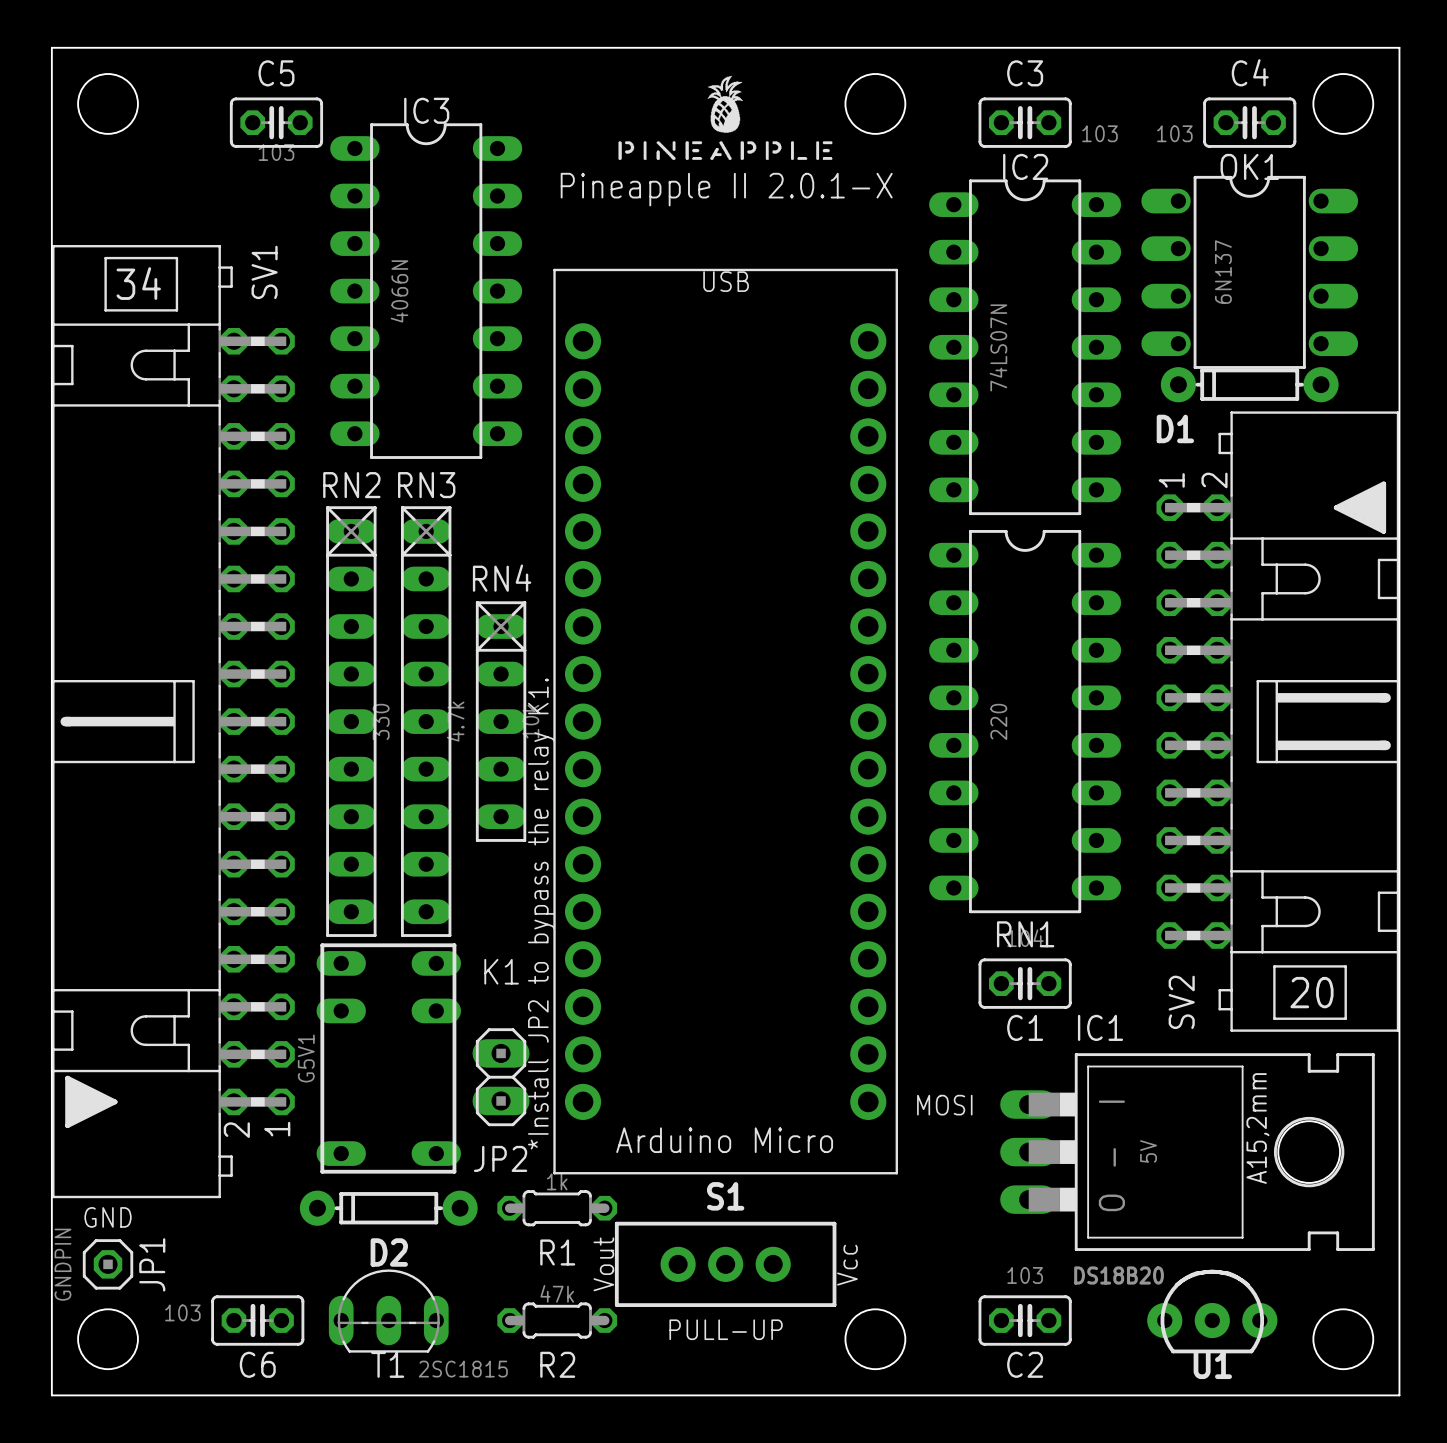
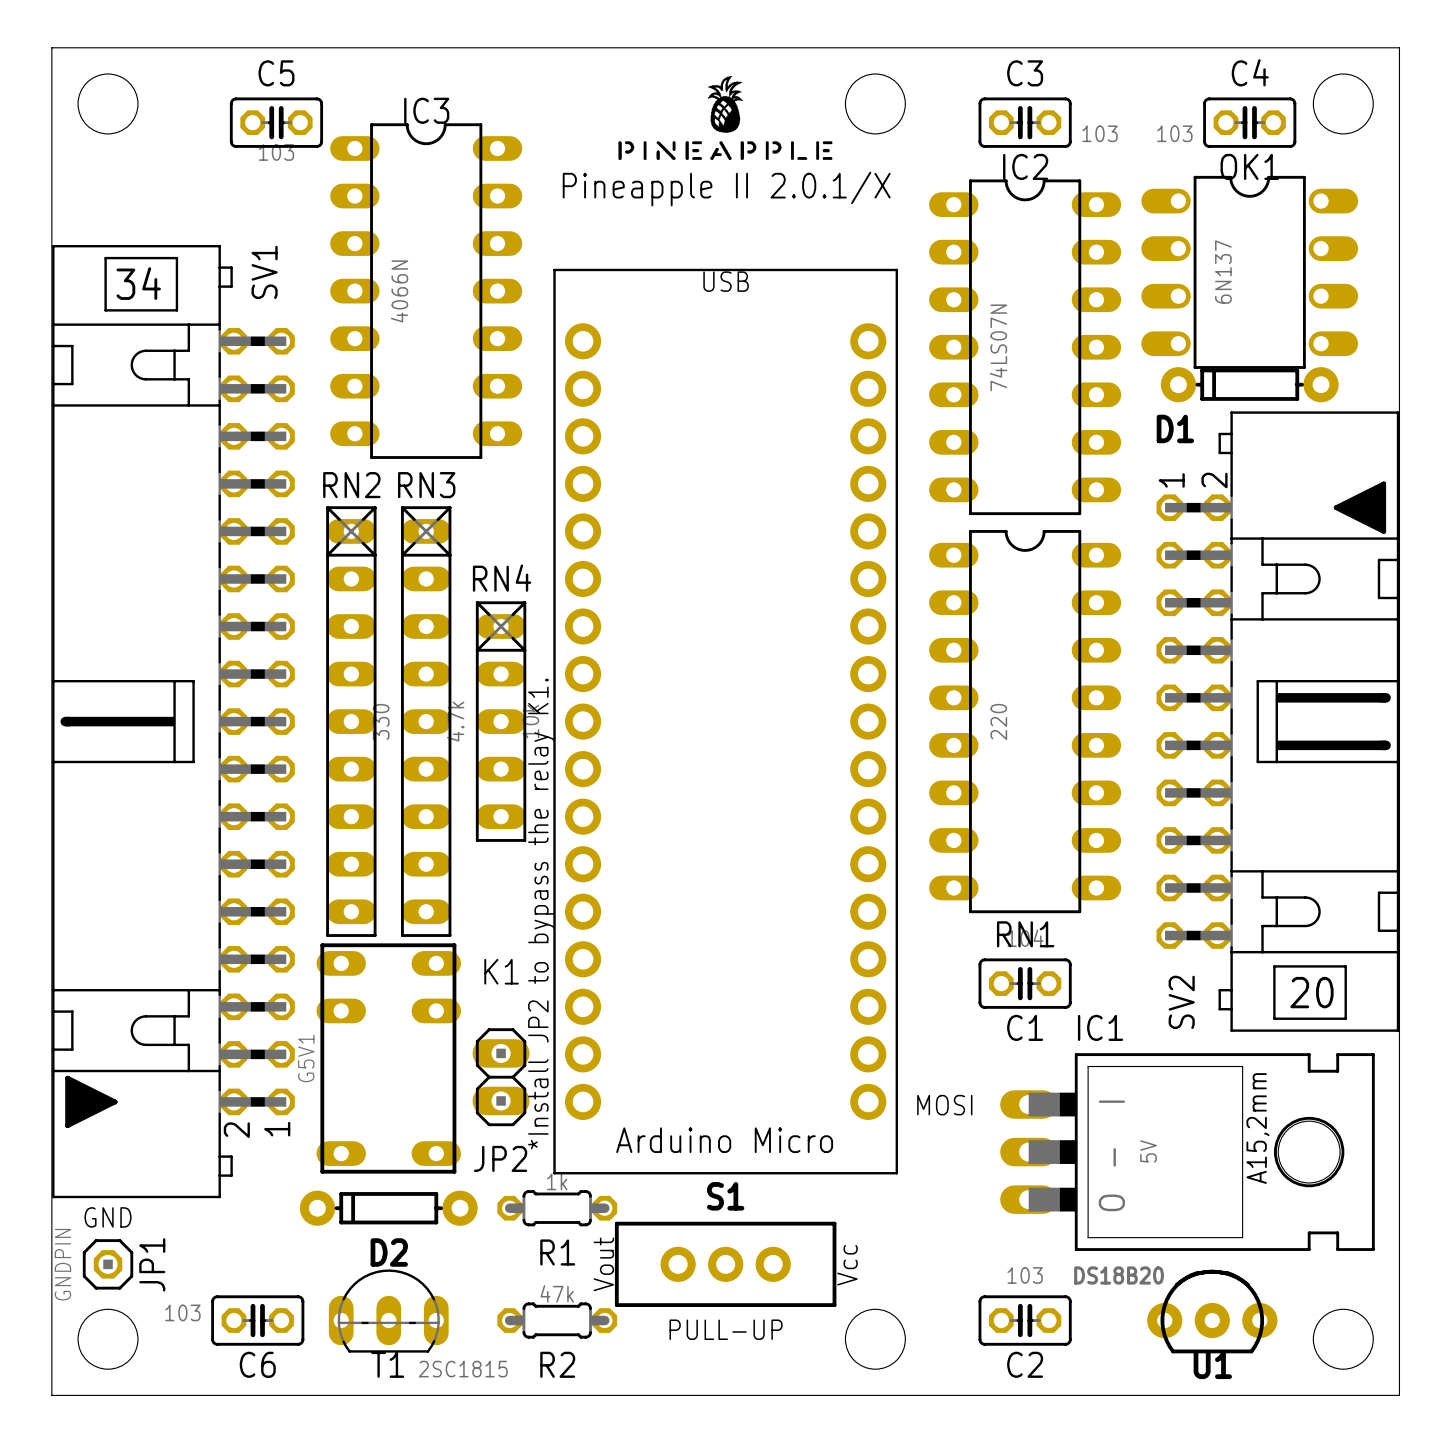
text: Pineapple II 2.0.1-X (726, 189) -> Pineapple II 2.0.1/X (726, 189)

